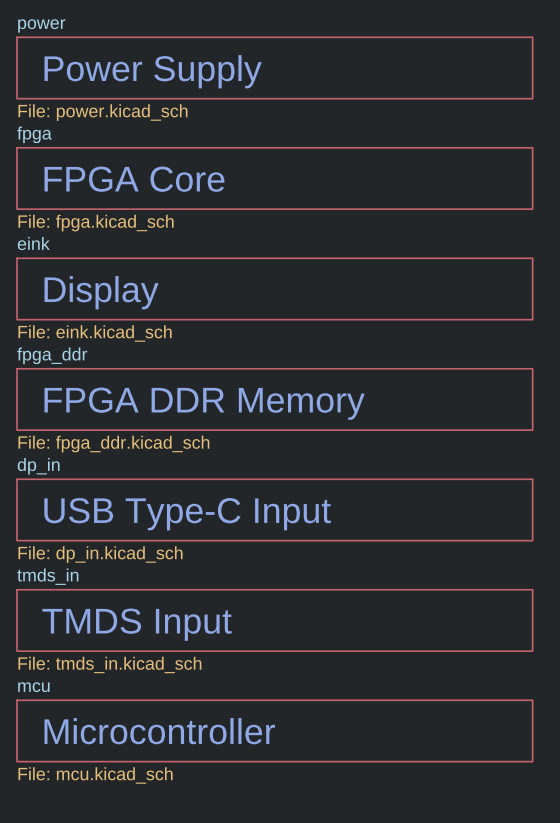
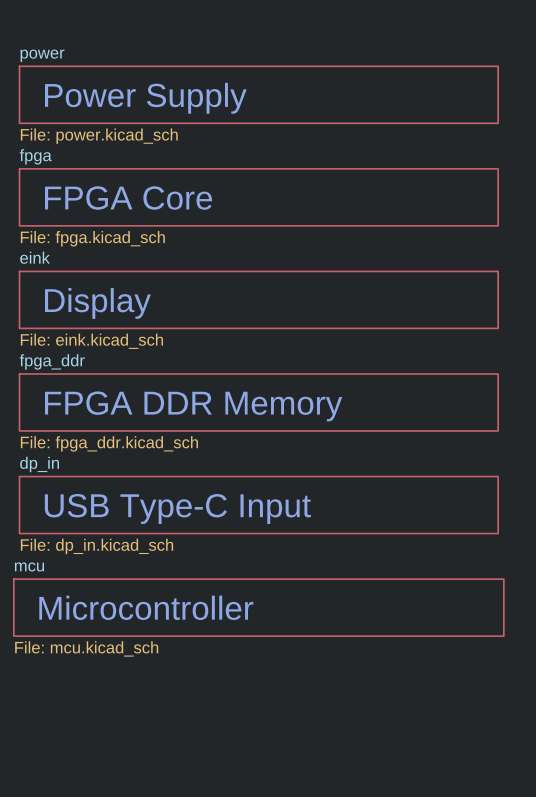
sheet tmds_in: File: tmds_in.kicad_sch (274, 620) -> none
sheet mcu: none -> File: mcu.kicad_sch (258, 607)
text: TMDS Input (137, 624) -> none
sheet mcu: File: mcu.kicad_sch (274, 730) -> none
text position: Microcontroller (159, 731) -> Microcontroller (146, 607)

